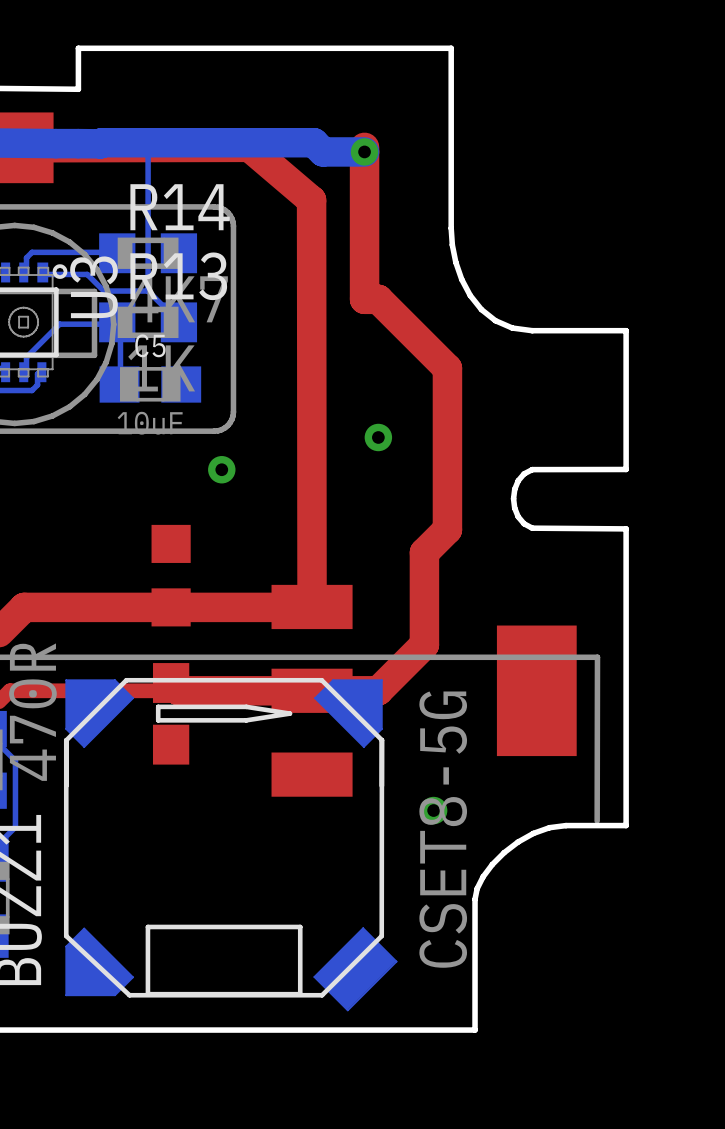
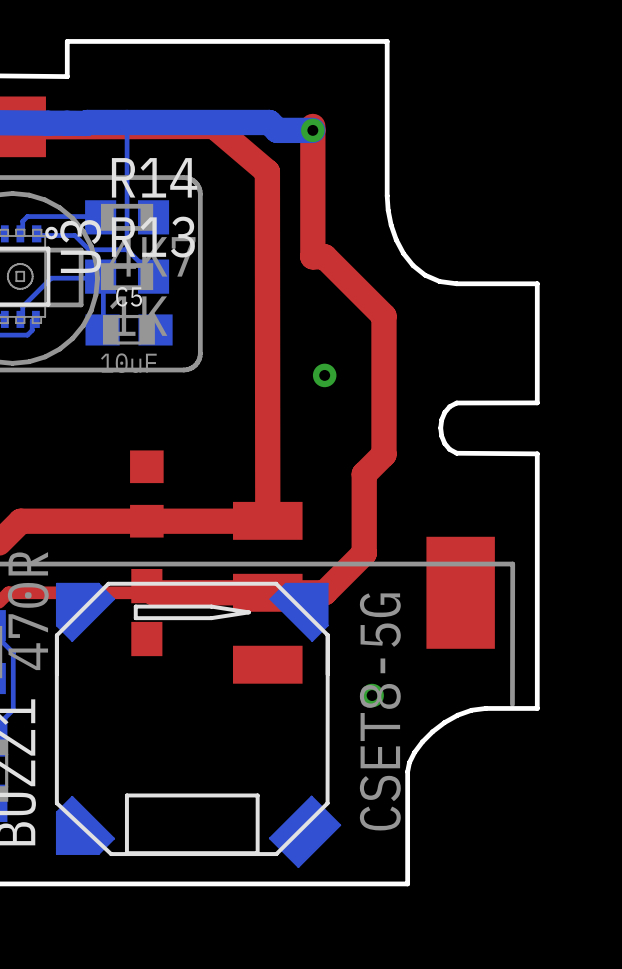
via: (221, 469) -> none

